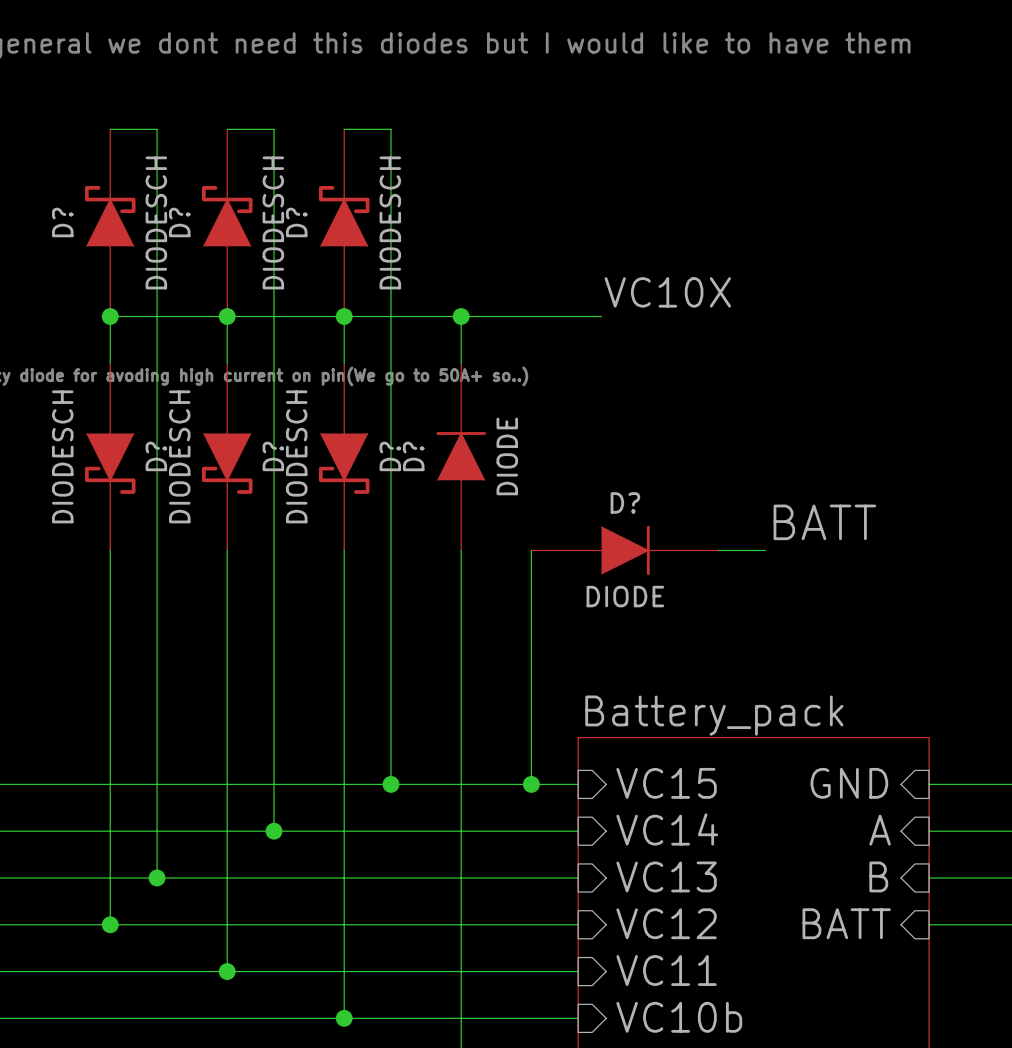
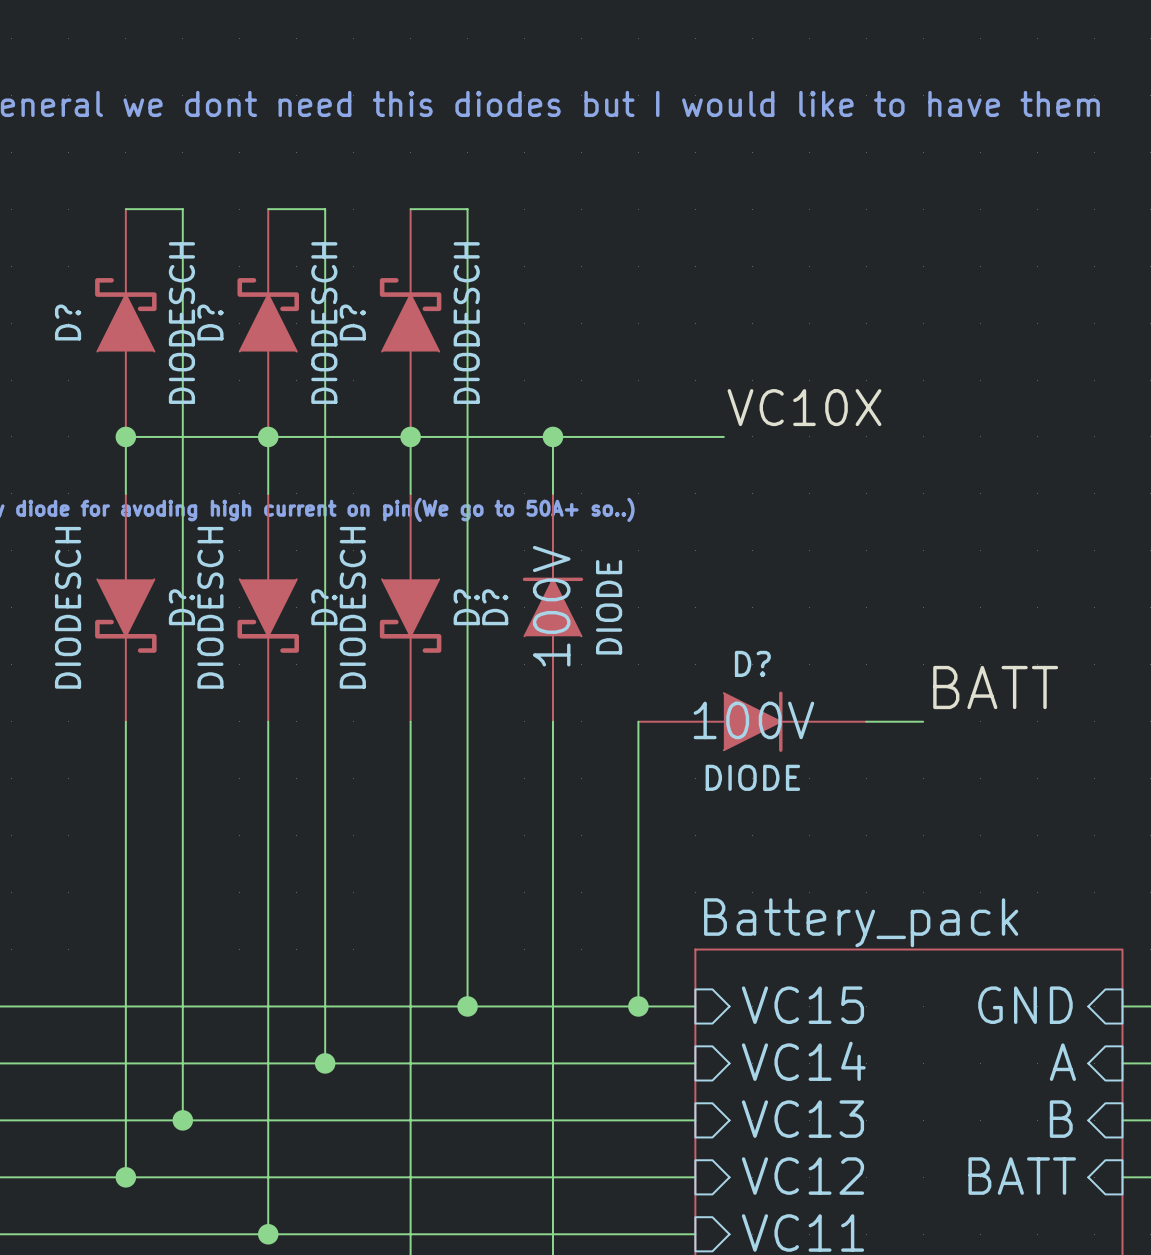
D? text: none -> 100V (551, 606)
D? text: none -> 100V (753, 720)

